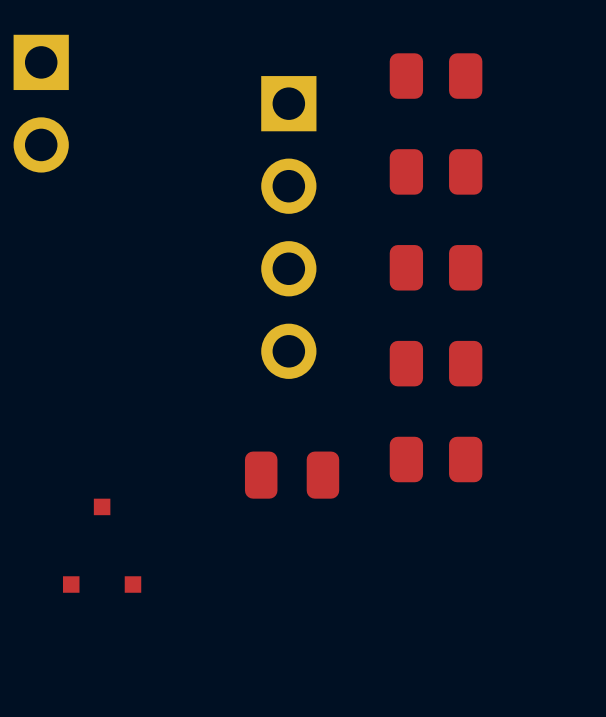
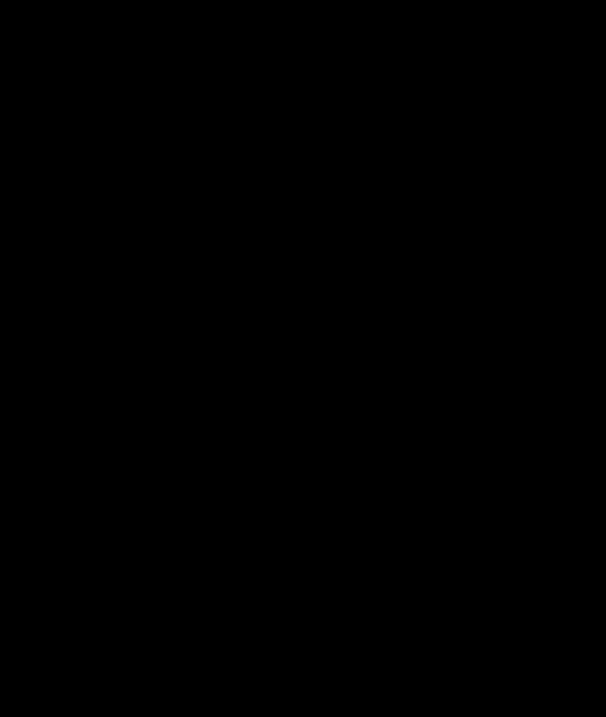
part: (436, 76) -> none
part: (41, 103) -> none
part: (436, 171) -> none
part: (288, 227) -> none
part: (436, 267) -> none
part: (436, 363) -> none
part: (436, 459) -> none
part: (292, 475) -> none
part: (102, 545) -> none

